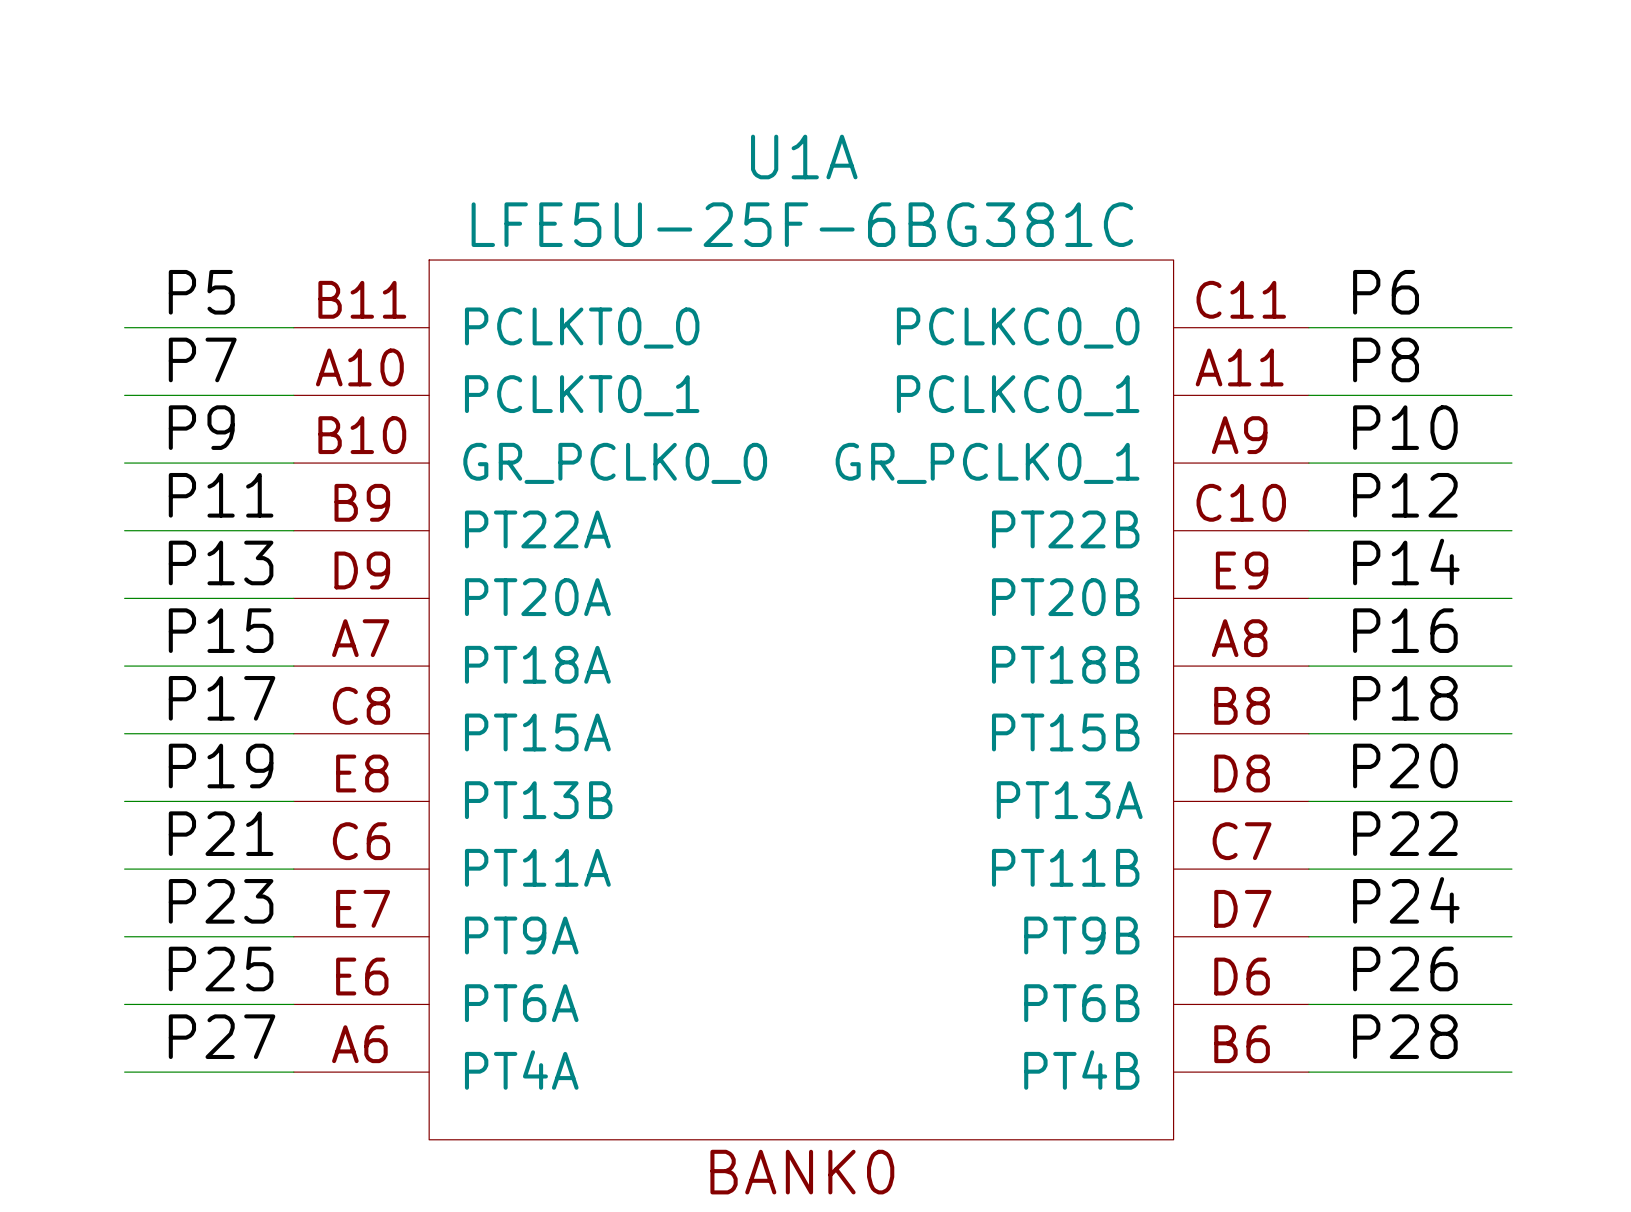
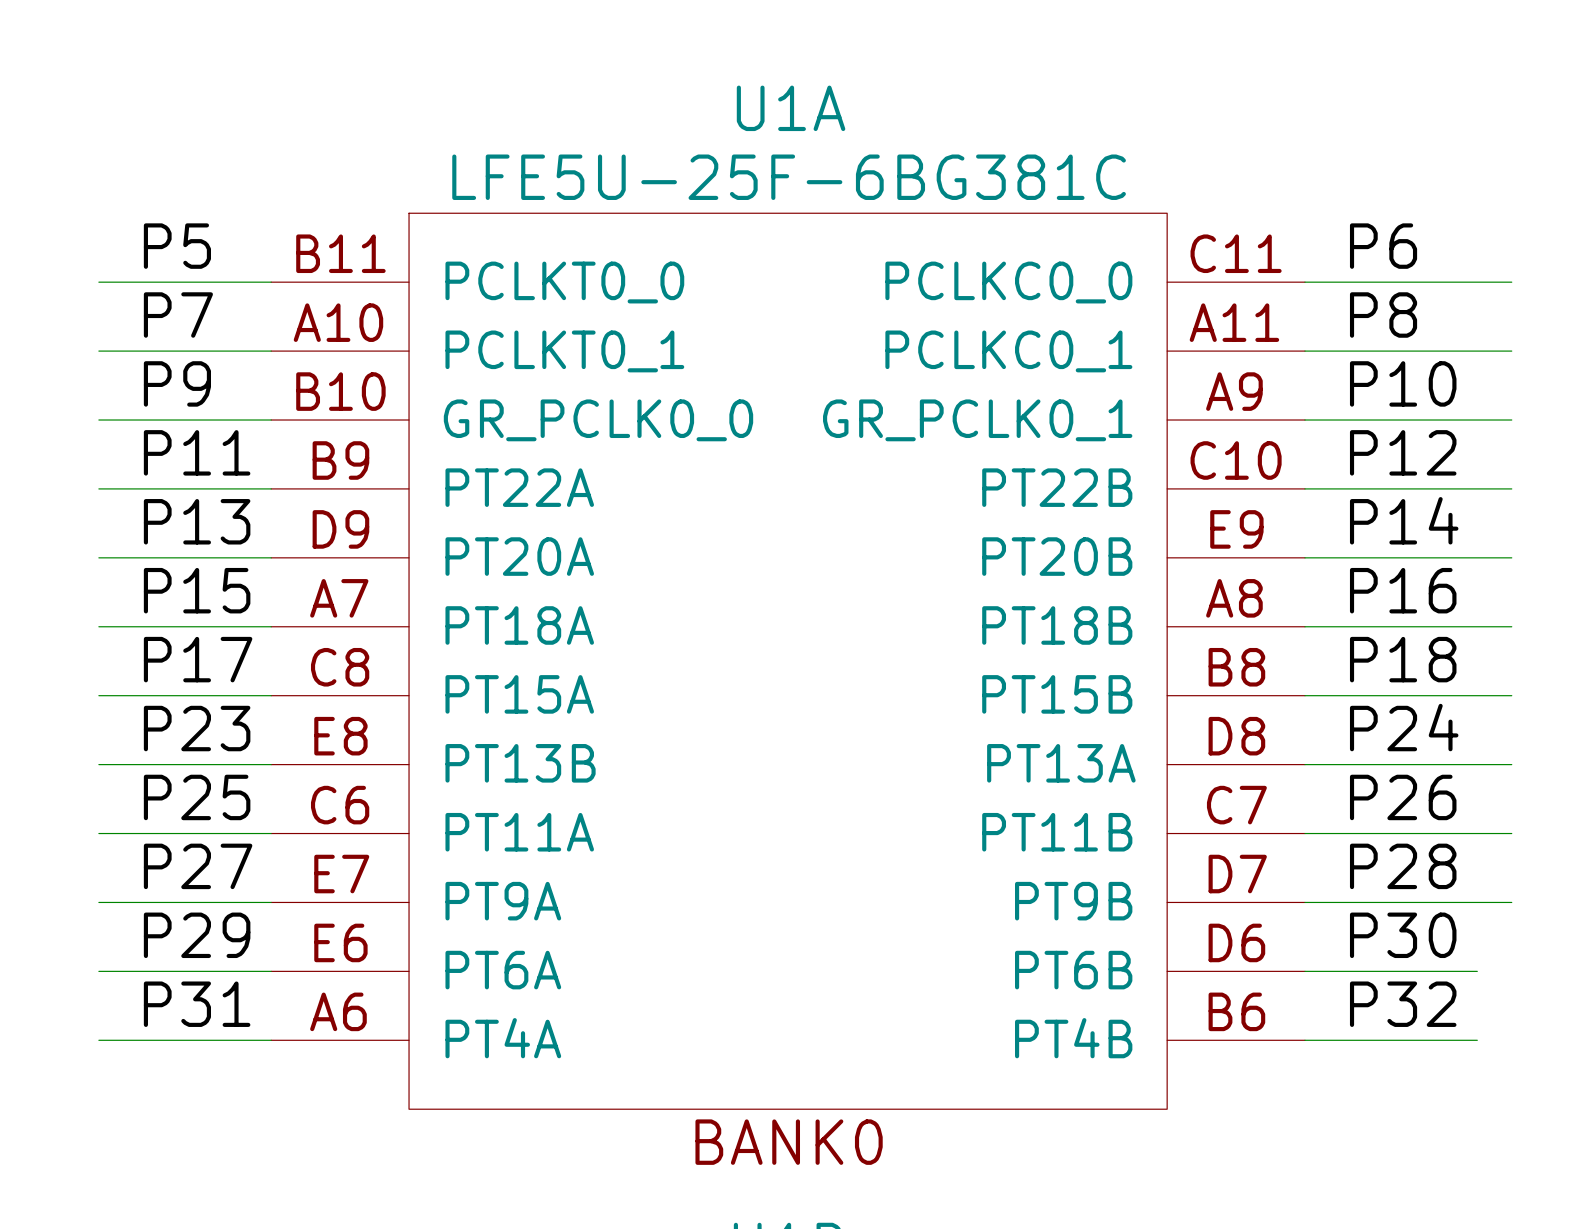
label: P19 (221, 765) -> P23 (197, 728)
label: P20 (1405, 765) -> P24 (1404, 727)
label: P21 (221, 833) -> P25 (197, 797)
label: P22 (1405, 833) -> P26 (1403, 797)
label: P24 (1406, 900) -> P28 (1403, 866)
label: P23 (221, 901) -> P27 (198, 866)
label: P25 (221, 969) -> P29 (197, 935)
label: P26 (1405, 969) -> P30 (1403, 935)
wire: (1478, 1004) (1511, 1004) -> none
label: P27 (222, 1036) -> P31 (197, 1004)
label: P28 (1405, 1036) -> P32 (1403, 1004)
wire: (1478, 1072) (1511, 1072) -> none

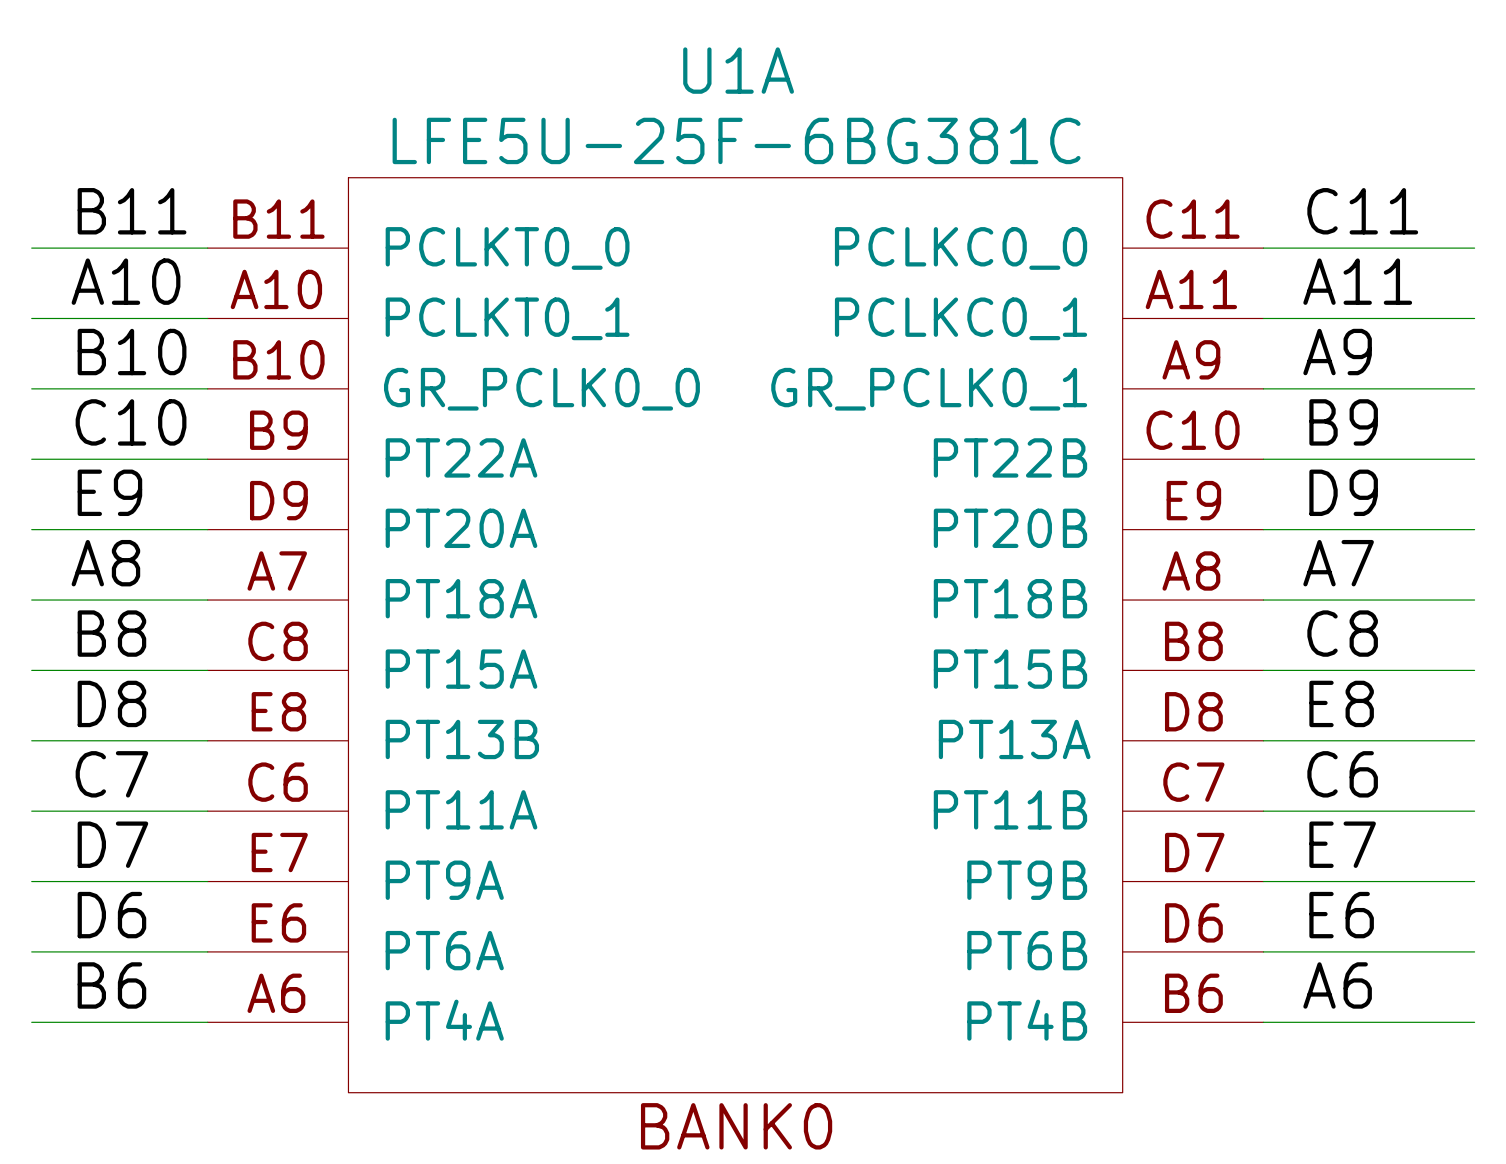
label: P5 (177, 246) -> B11 (132, 211)
label: P6 (1383, 246) -> C11 (1362, 211)
label: P7 (178, 315) -> A10 (126, 281)
label: P8 (1383, 315) -> A11 (1357, 281)
label: P9 (177, 383) -> B10 (132, 352)
label: P10 (1403, 383) -> A9 (1337, 352)
label: P11 (197, 452) -> C10 (131, 422)
label: P12 (1403, 452) -> B9 (1343, 422)
label: P14 (1404, 520) -> D9 (1343, 492)
label: P13 (197, 521) -> E9 (109, 492)
label: P15 (197, 590) -> A8 (105, 563)
label: P16 (1403, 590) -> A7 (1338, 563)
label: P17 (198, 659) -> B8 (111, 633)
label: P18 (1403, 659) -> C8 (1342, 633)
label: P24 (1404, 727) -> E8 (1341, 703)
label: P23 (197, 728) -> D8 (111, 703)
label: P25 (197, 797) -> C7 (111, 774)
label: P26 (1403, 797) -> C6 (1342, 774)
label: P27 (198, 866) -> D7 (112, 844)
label: P28 (1403, 866) -> E7 (1342, 844)
label: P29 (197, 935) -> D6 (111, 915)
label: P30 (1403, 935) -> E6 (1341, 915)
wire: none -> (1439, 951) (1474, 951)
label: P31 (197, 1004) -> B6 (111, 985)
label: P32 (1403, 1004) -> A6 (1337, 985)
wire: none -> (1439, 1022) (1474, 1022)

